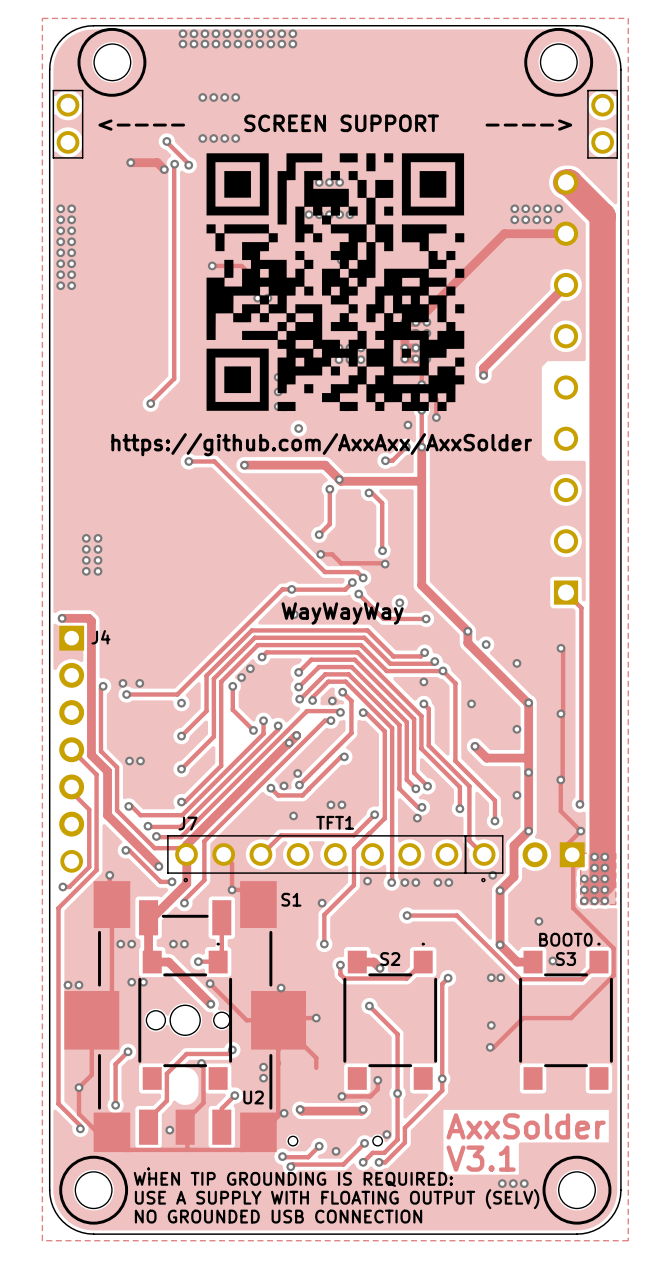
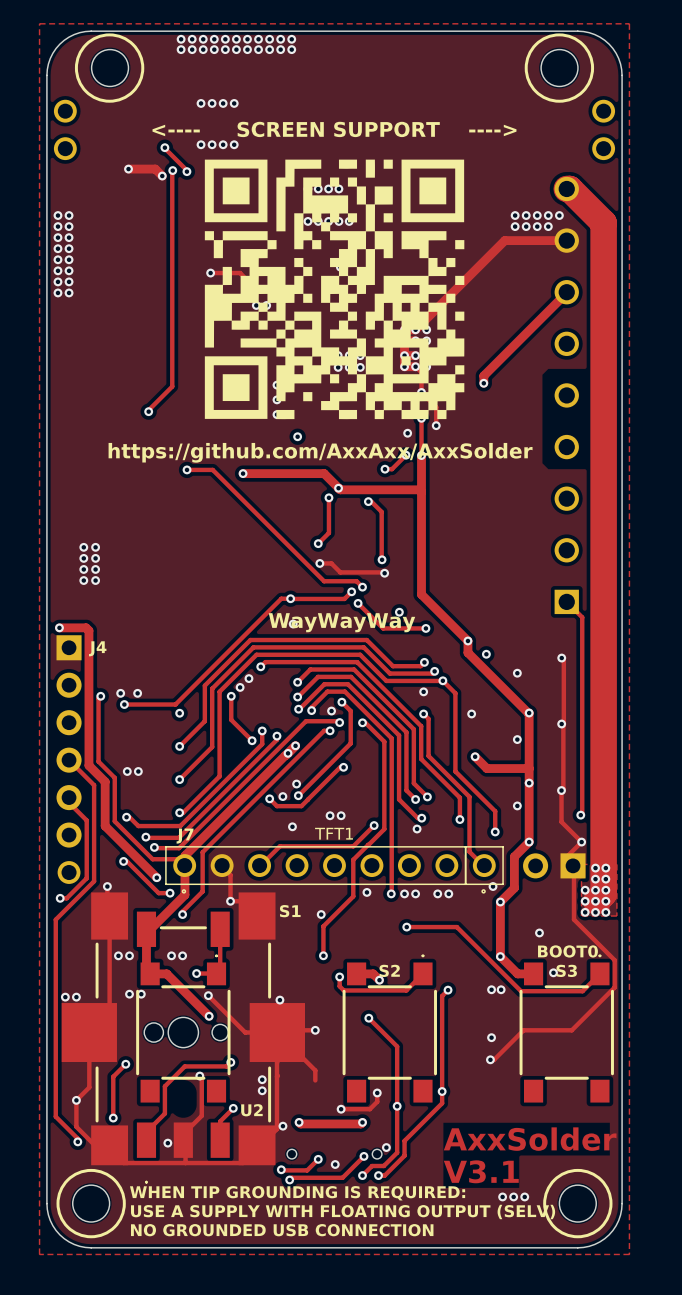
part footprint: [52, 89, 84, 159] -> [53, 99, 77, 161]
part footprint: [587, 89, 619, 159] -> [592, 99, 616, 161]

